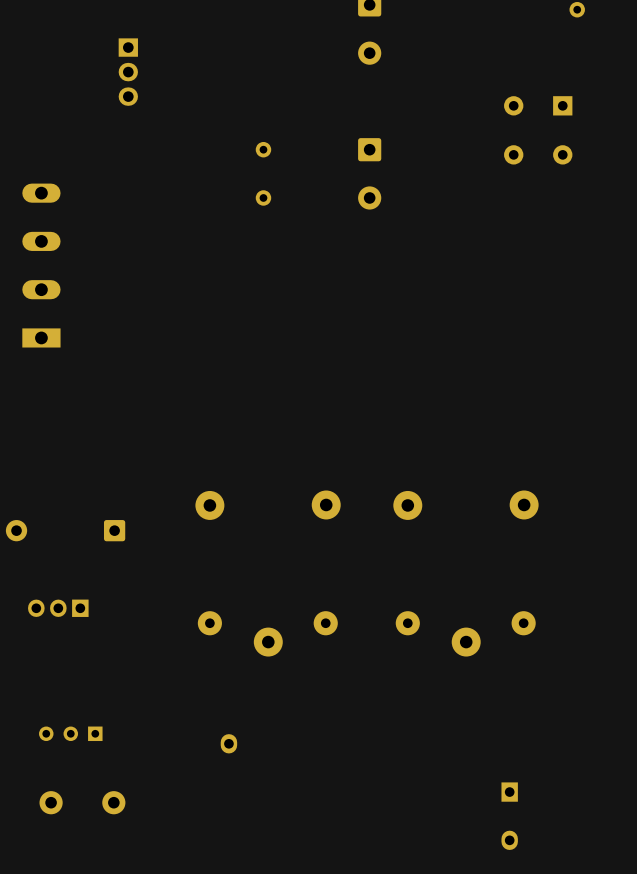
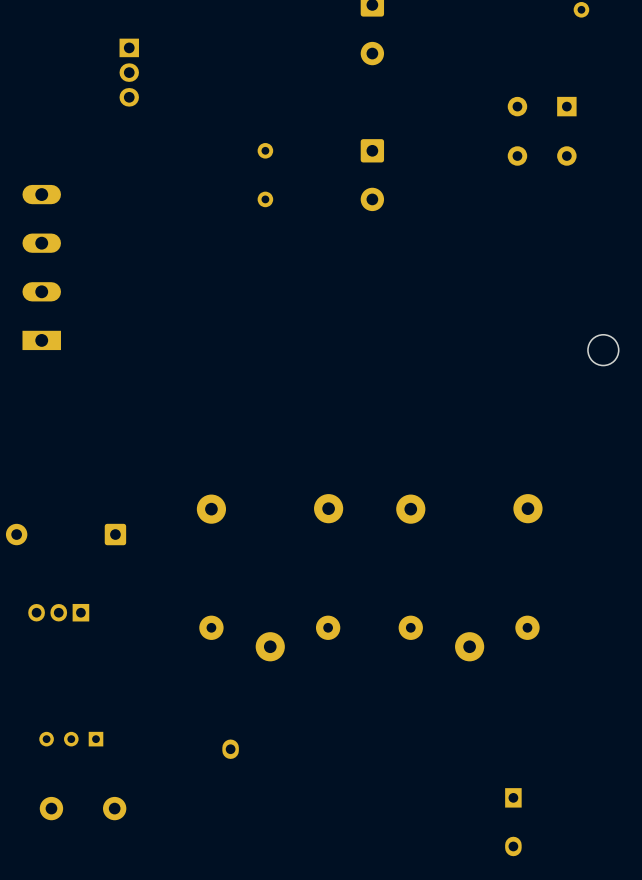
round board edge: none -> [587, 334, 619, 366]

